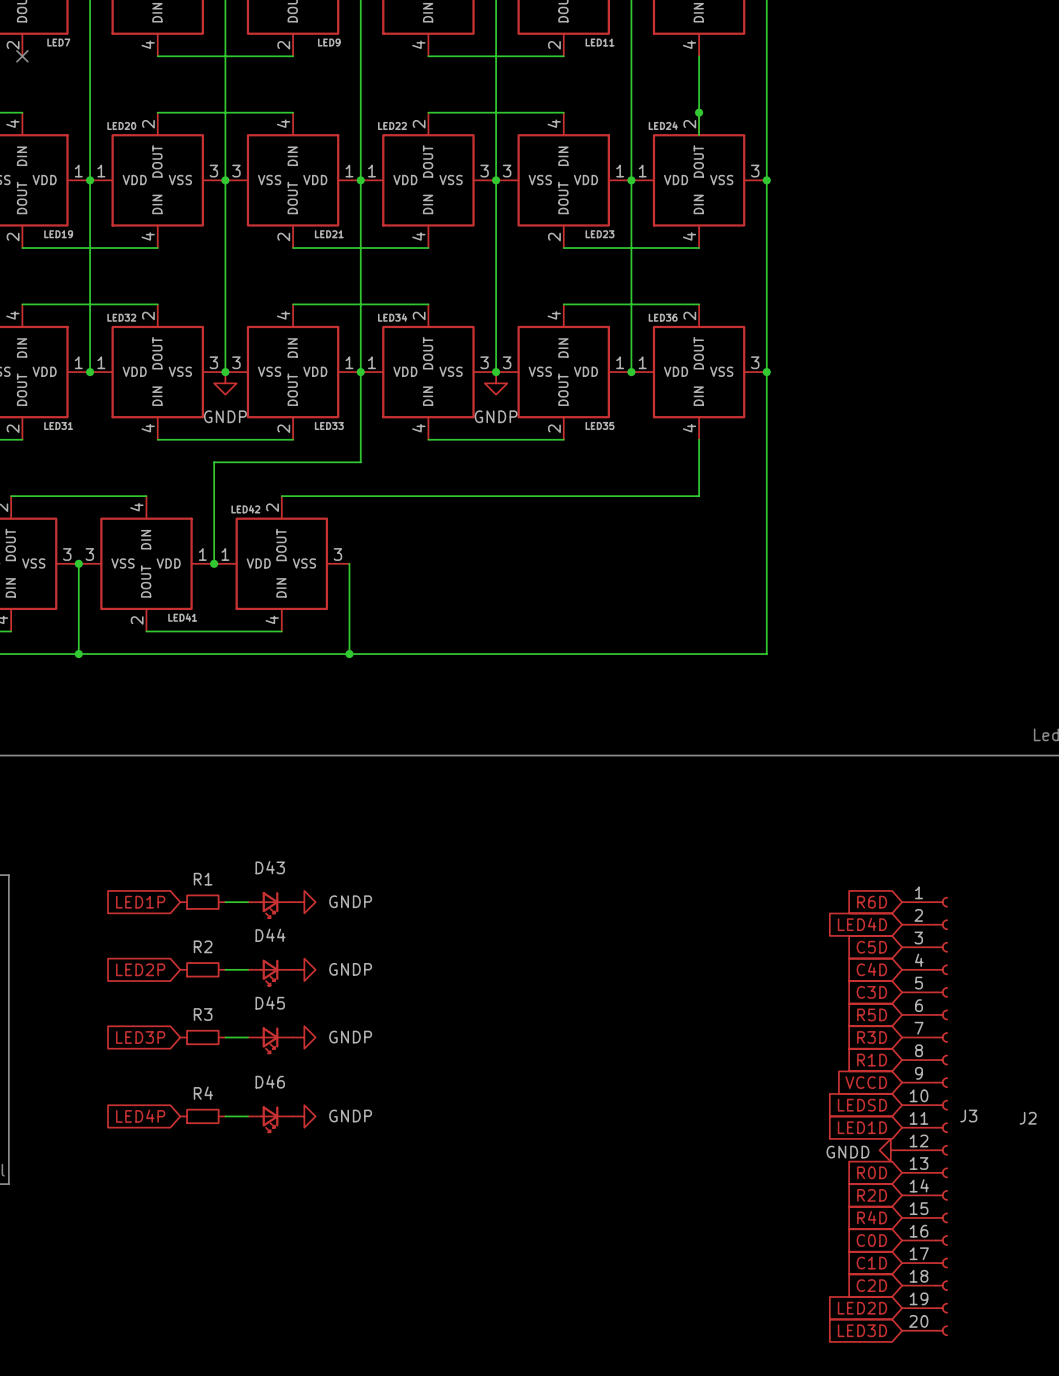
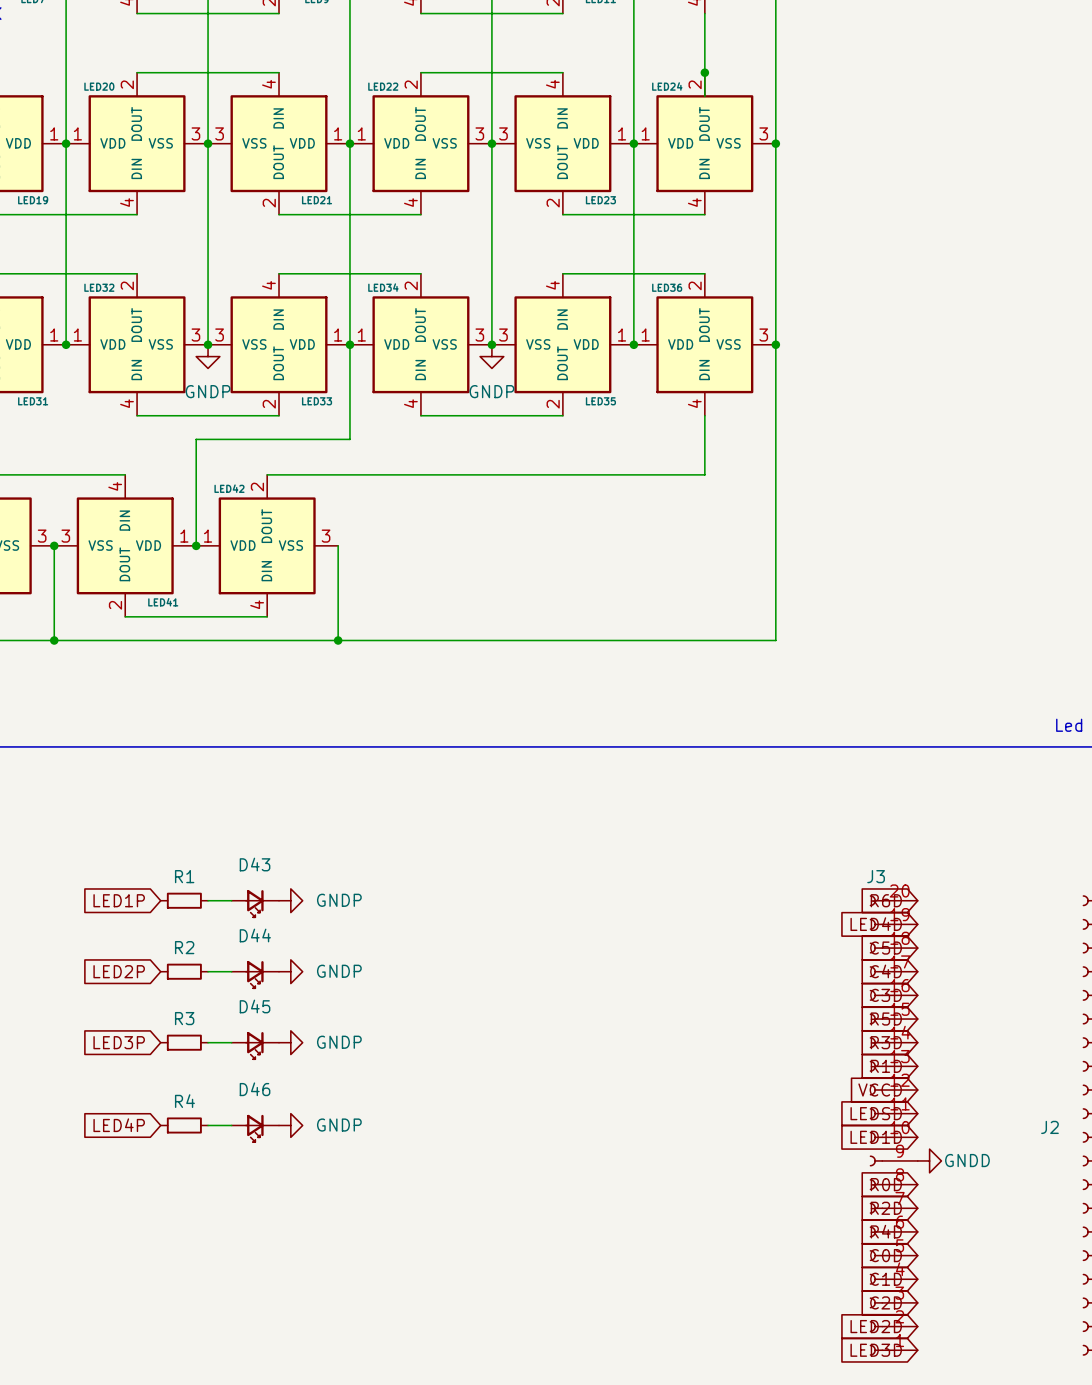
J3 rotation: 0° (941, 1116) -> 180° (876, 1125)
J3 name position: J3 (968, 1116) -> J3 (876, 876)
power symbol rotation: 0° (890, 1150) -> 180° (929, 1160)
power symbol position: GNDD (890, 1150) -> GNDD (929, 1160)

